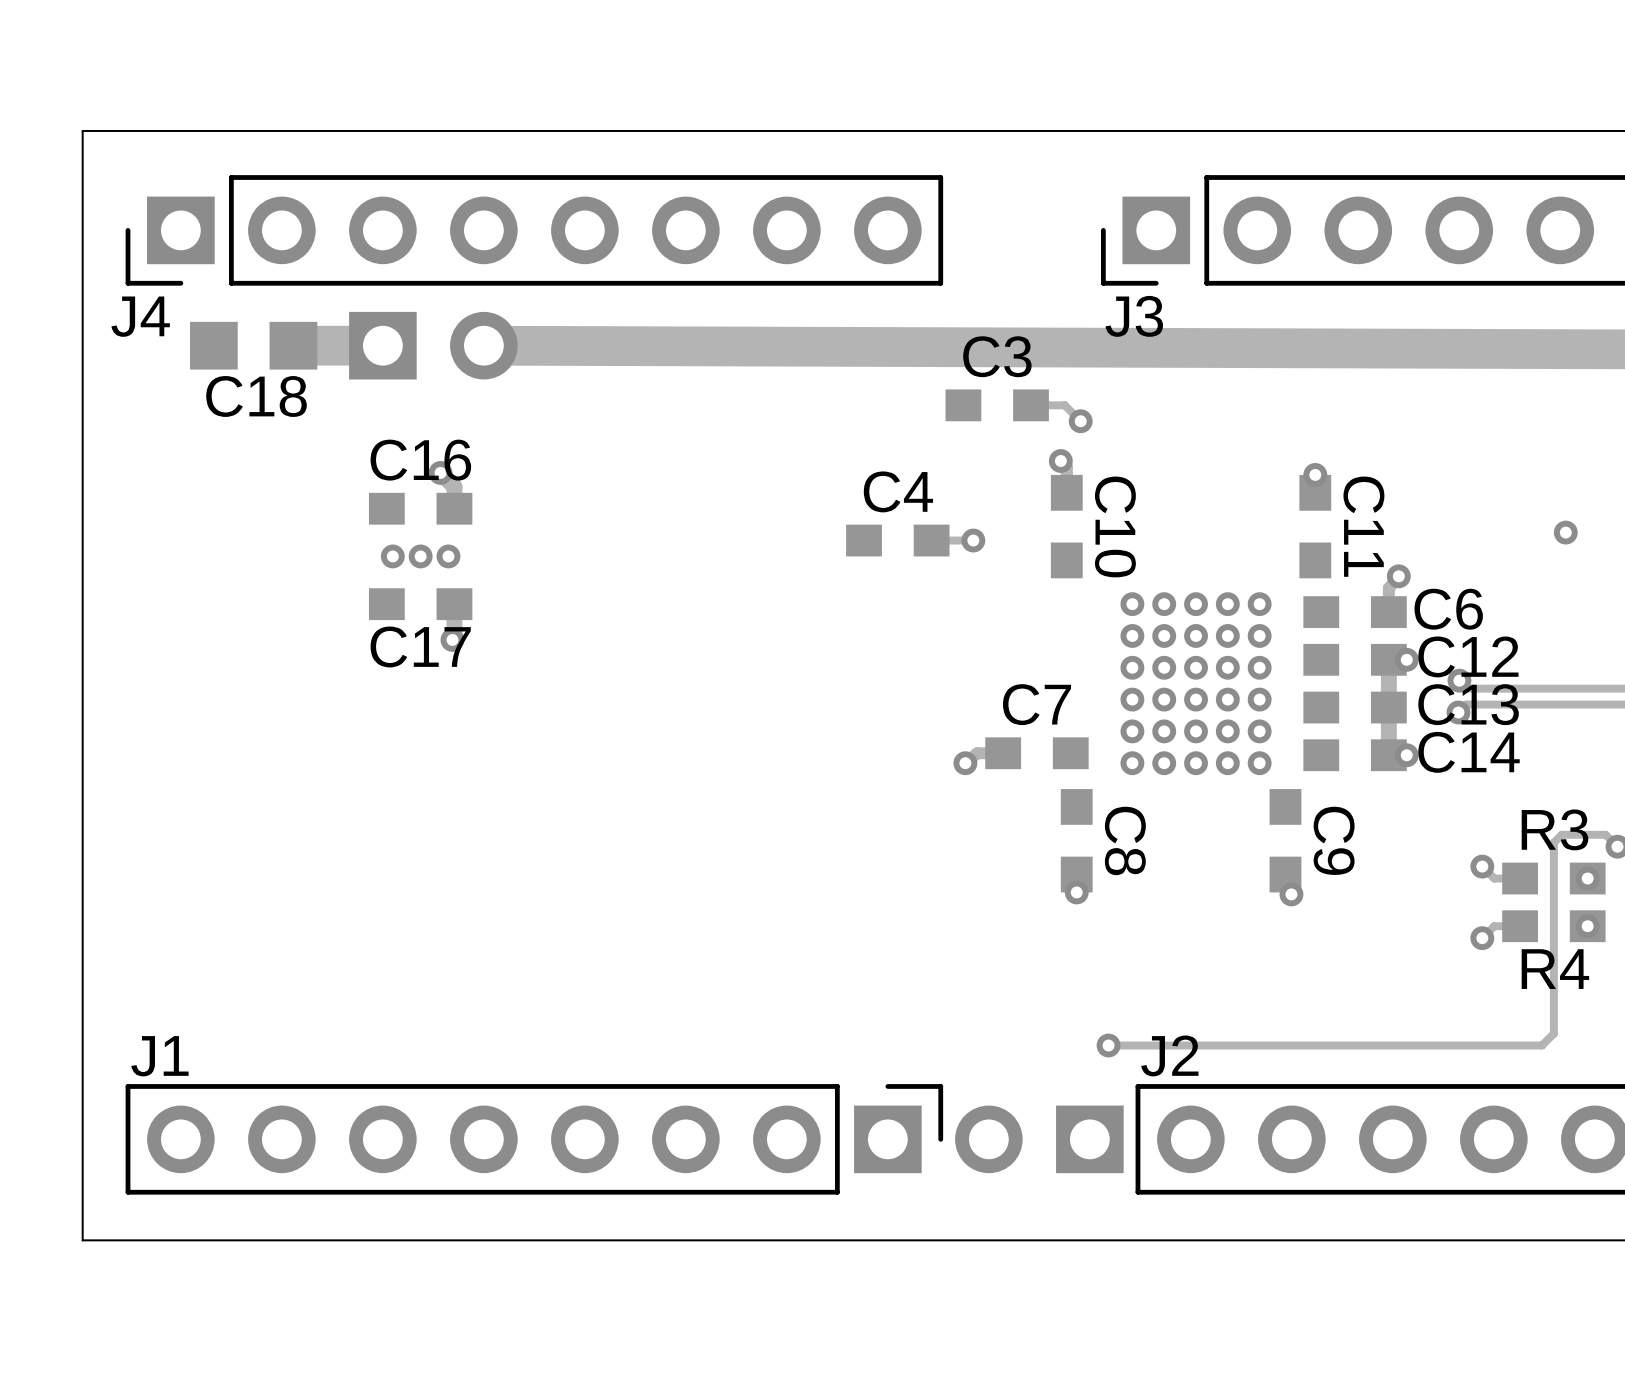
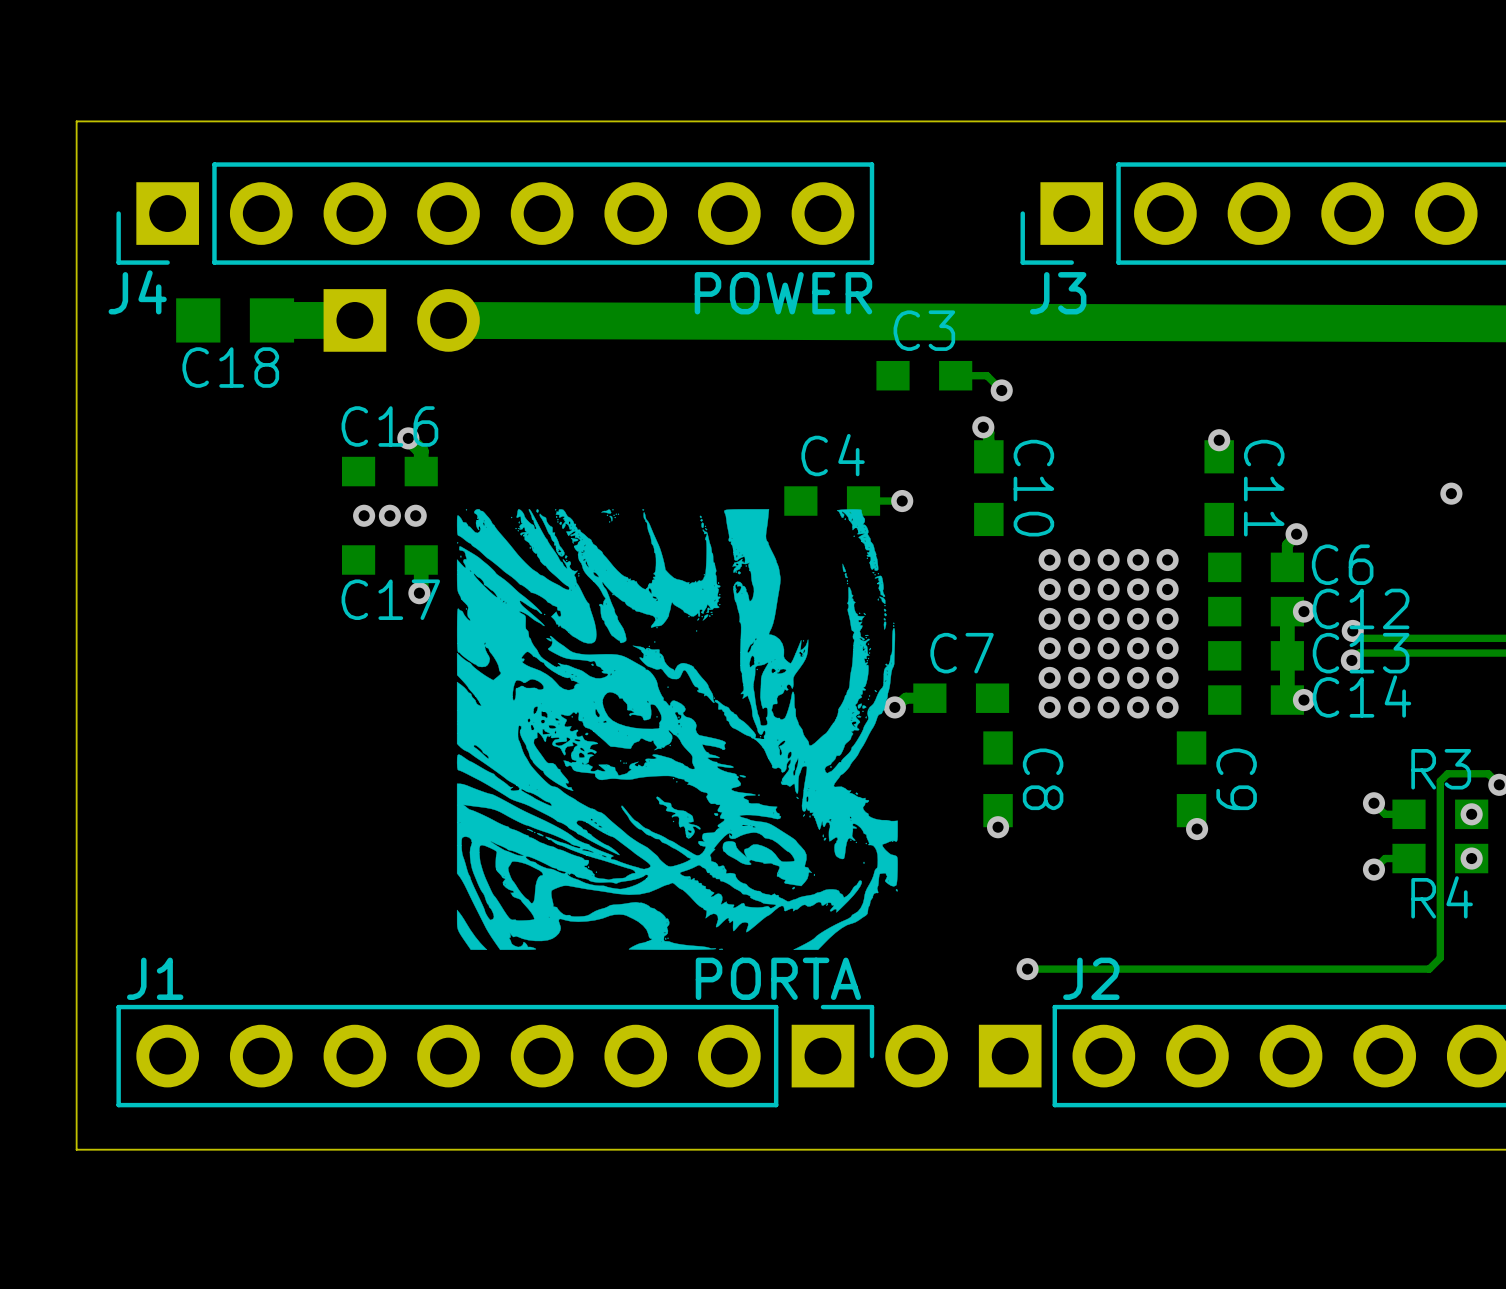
J4 value: none -> POWER (783, 293)
drawing: none -> [456, 509, 898, 951]
J1 value: none -> PORTA (778, 978)

